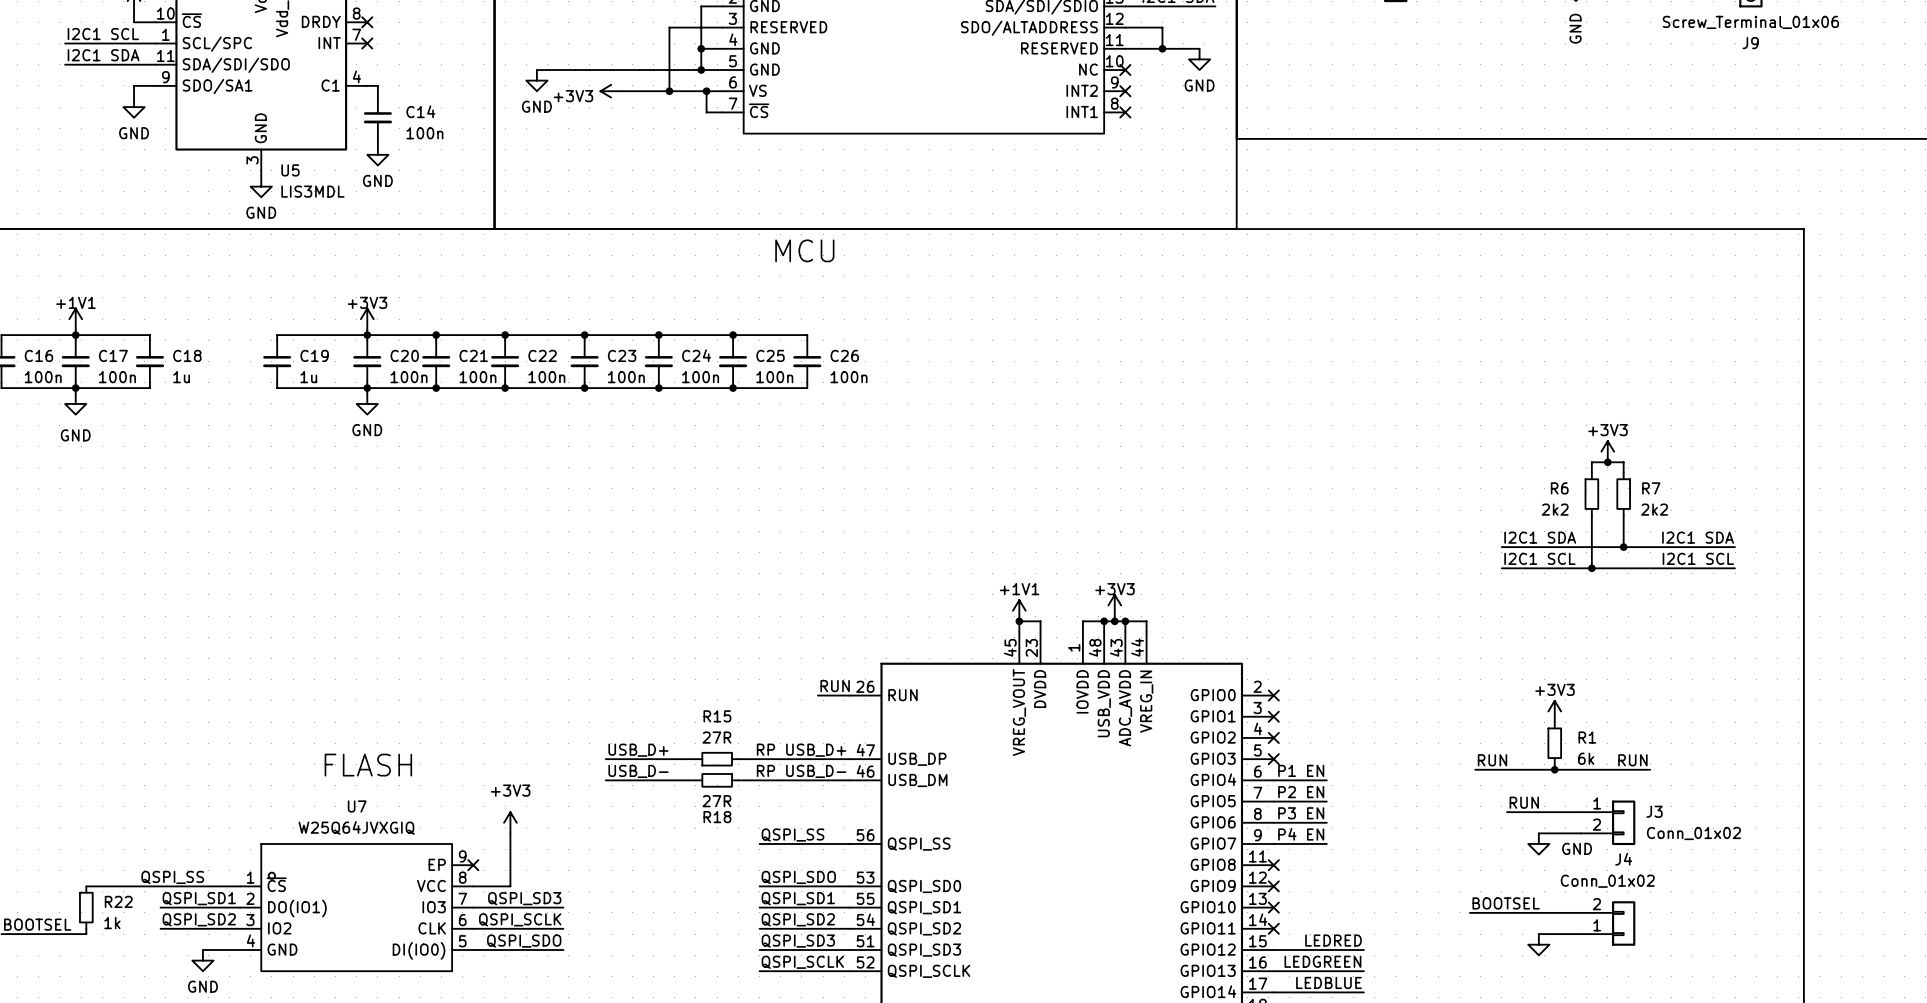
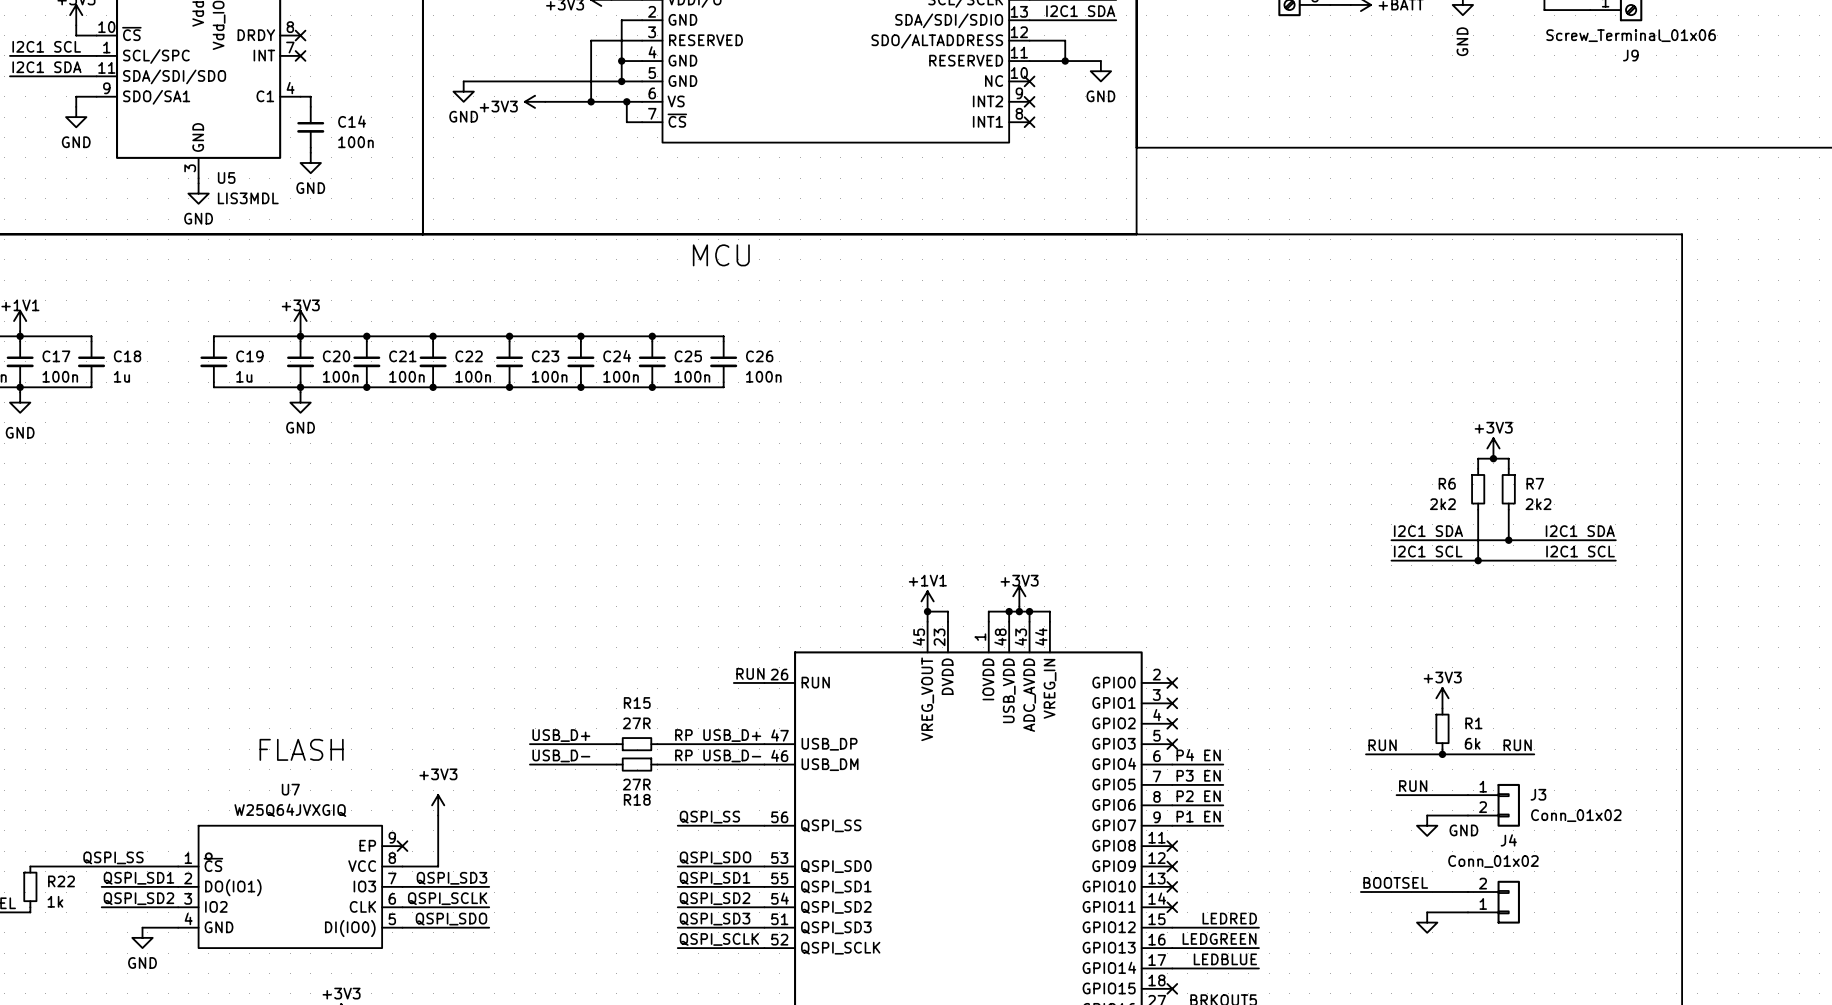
label: P1 EN (1301, 770) -> P4 EN (1198, 755)
label: P2 EN (1301, 792) -> P3 EN (1198, 775)
label: P3 EN (1301, 813) -> P2 EN (1198, 796)
label: P4 EN (1301, 834) -> P1 EN (1198, 816)

